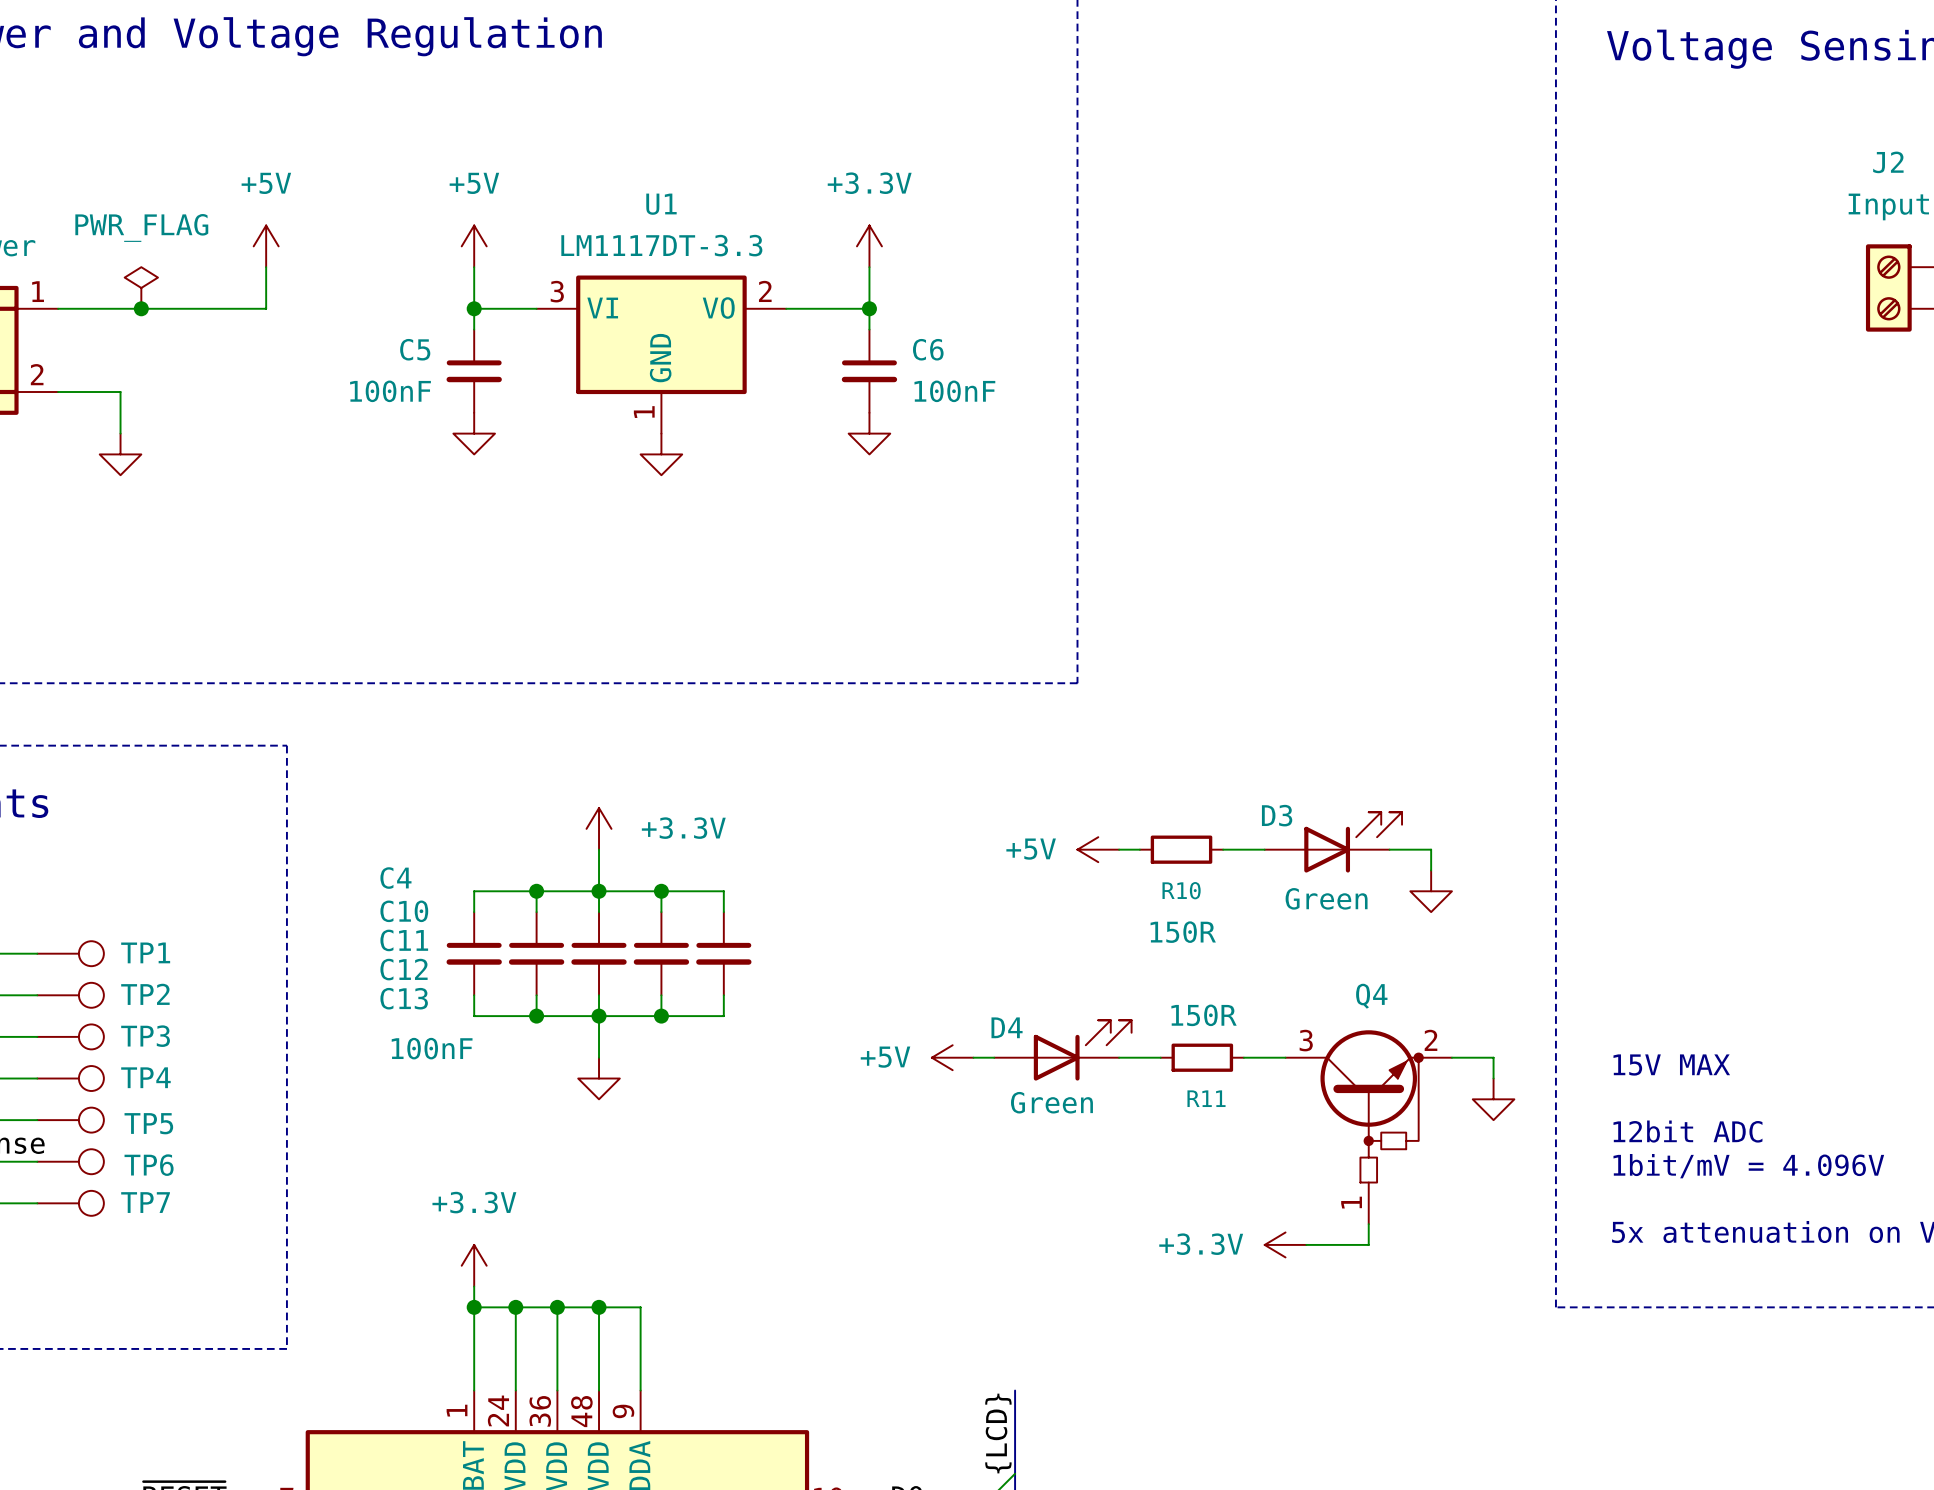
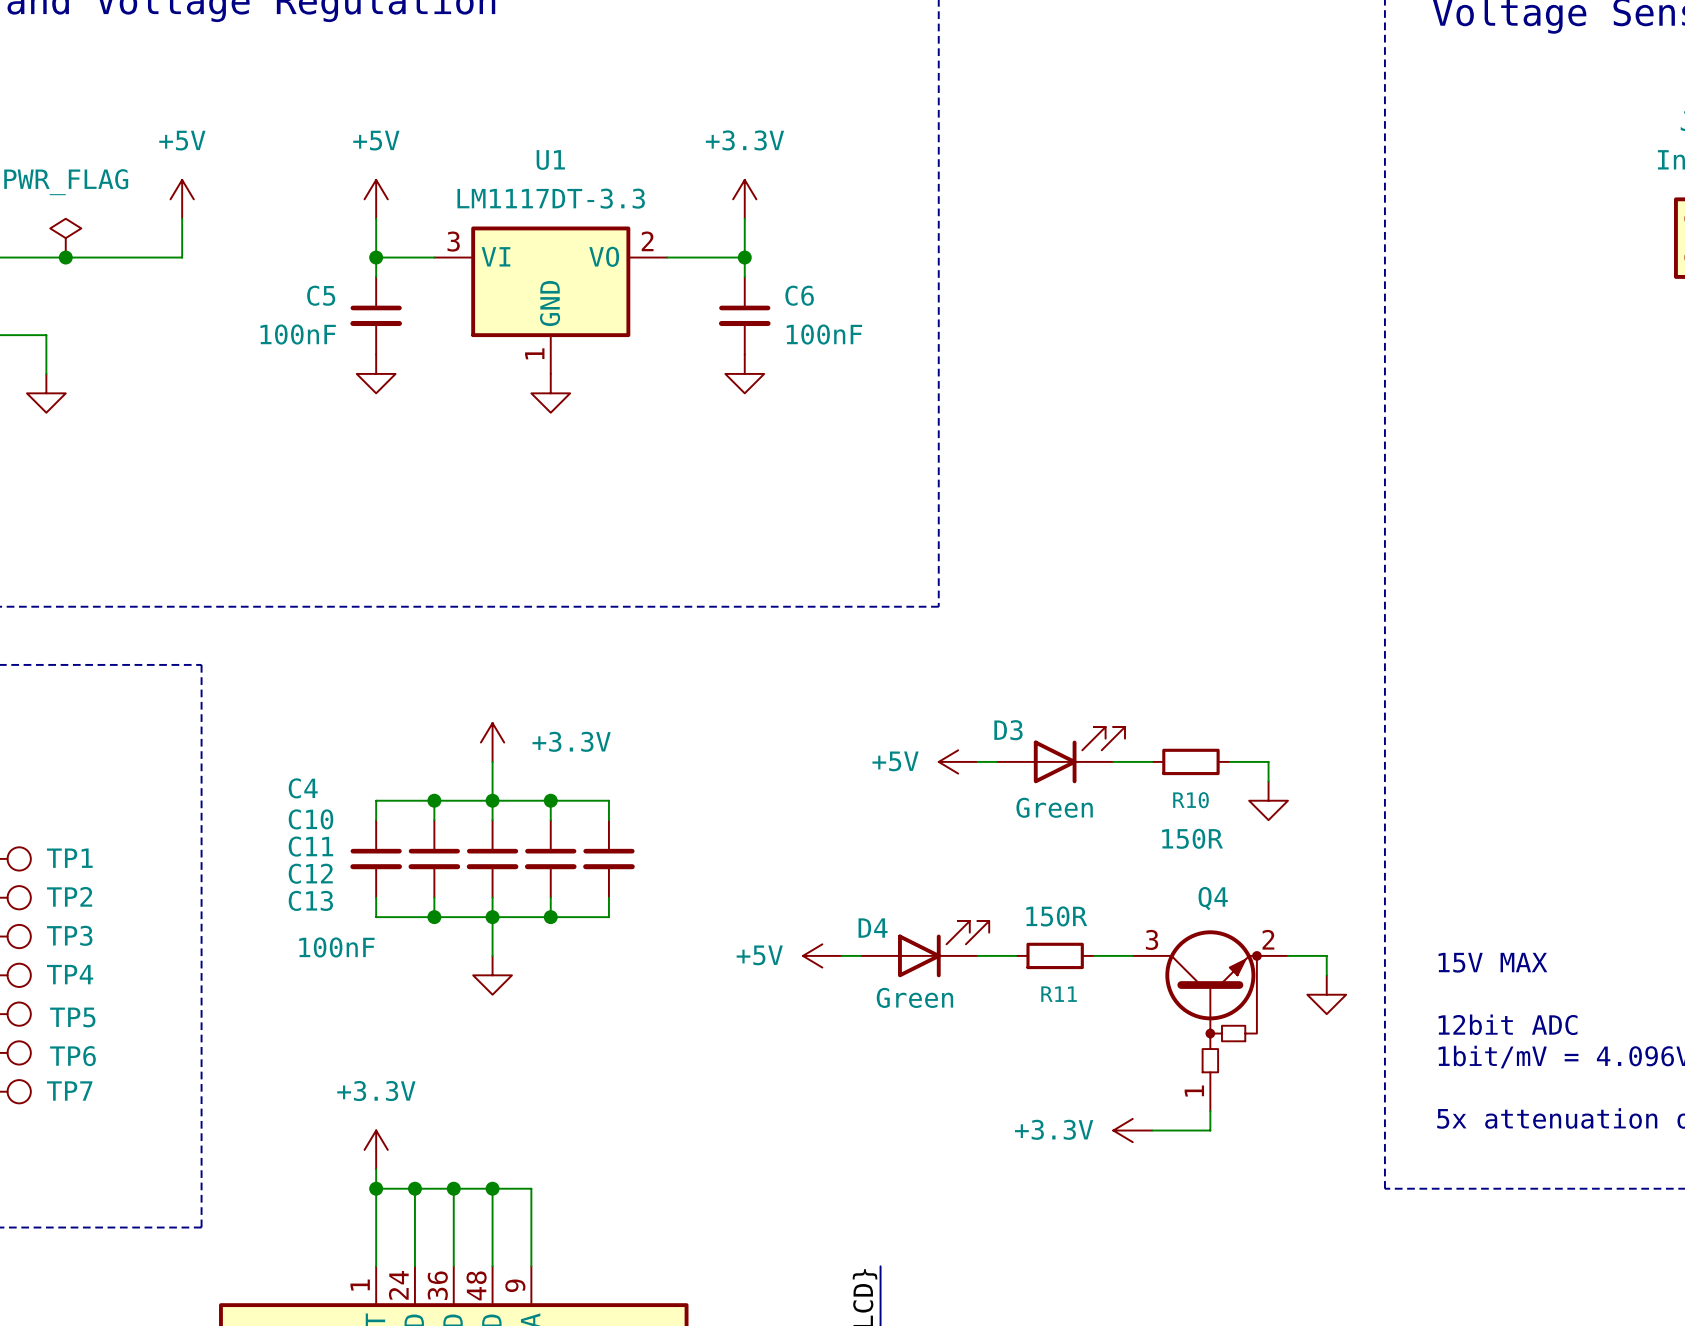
D3 position: (1333, 842) -> (1060, 755)
R10 position: (1181, 849) -> (1190, 761)

